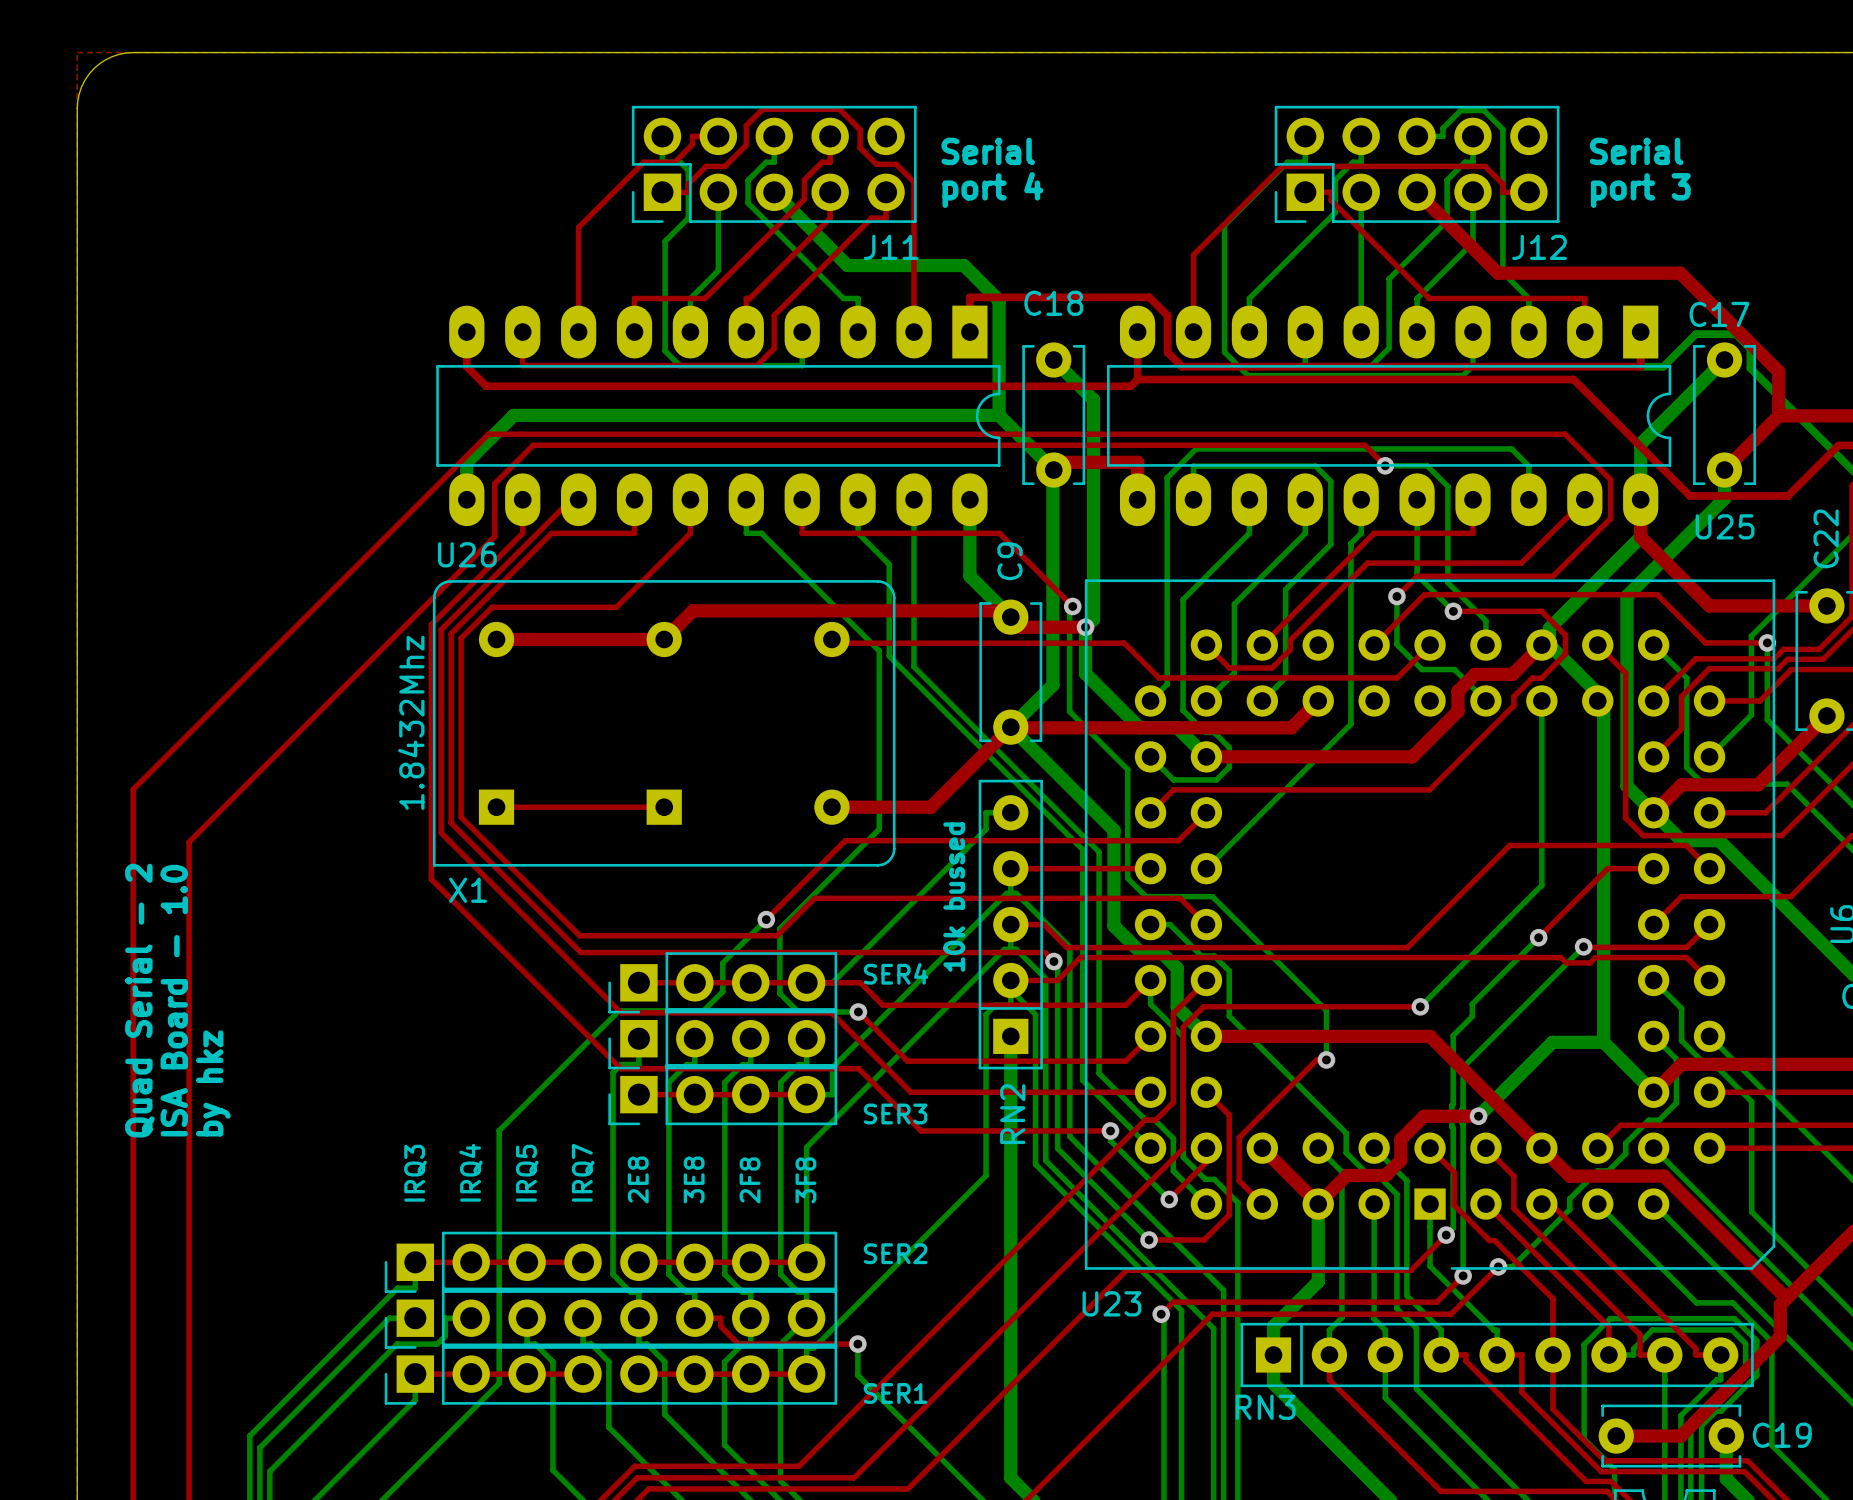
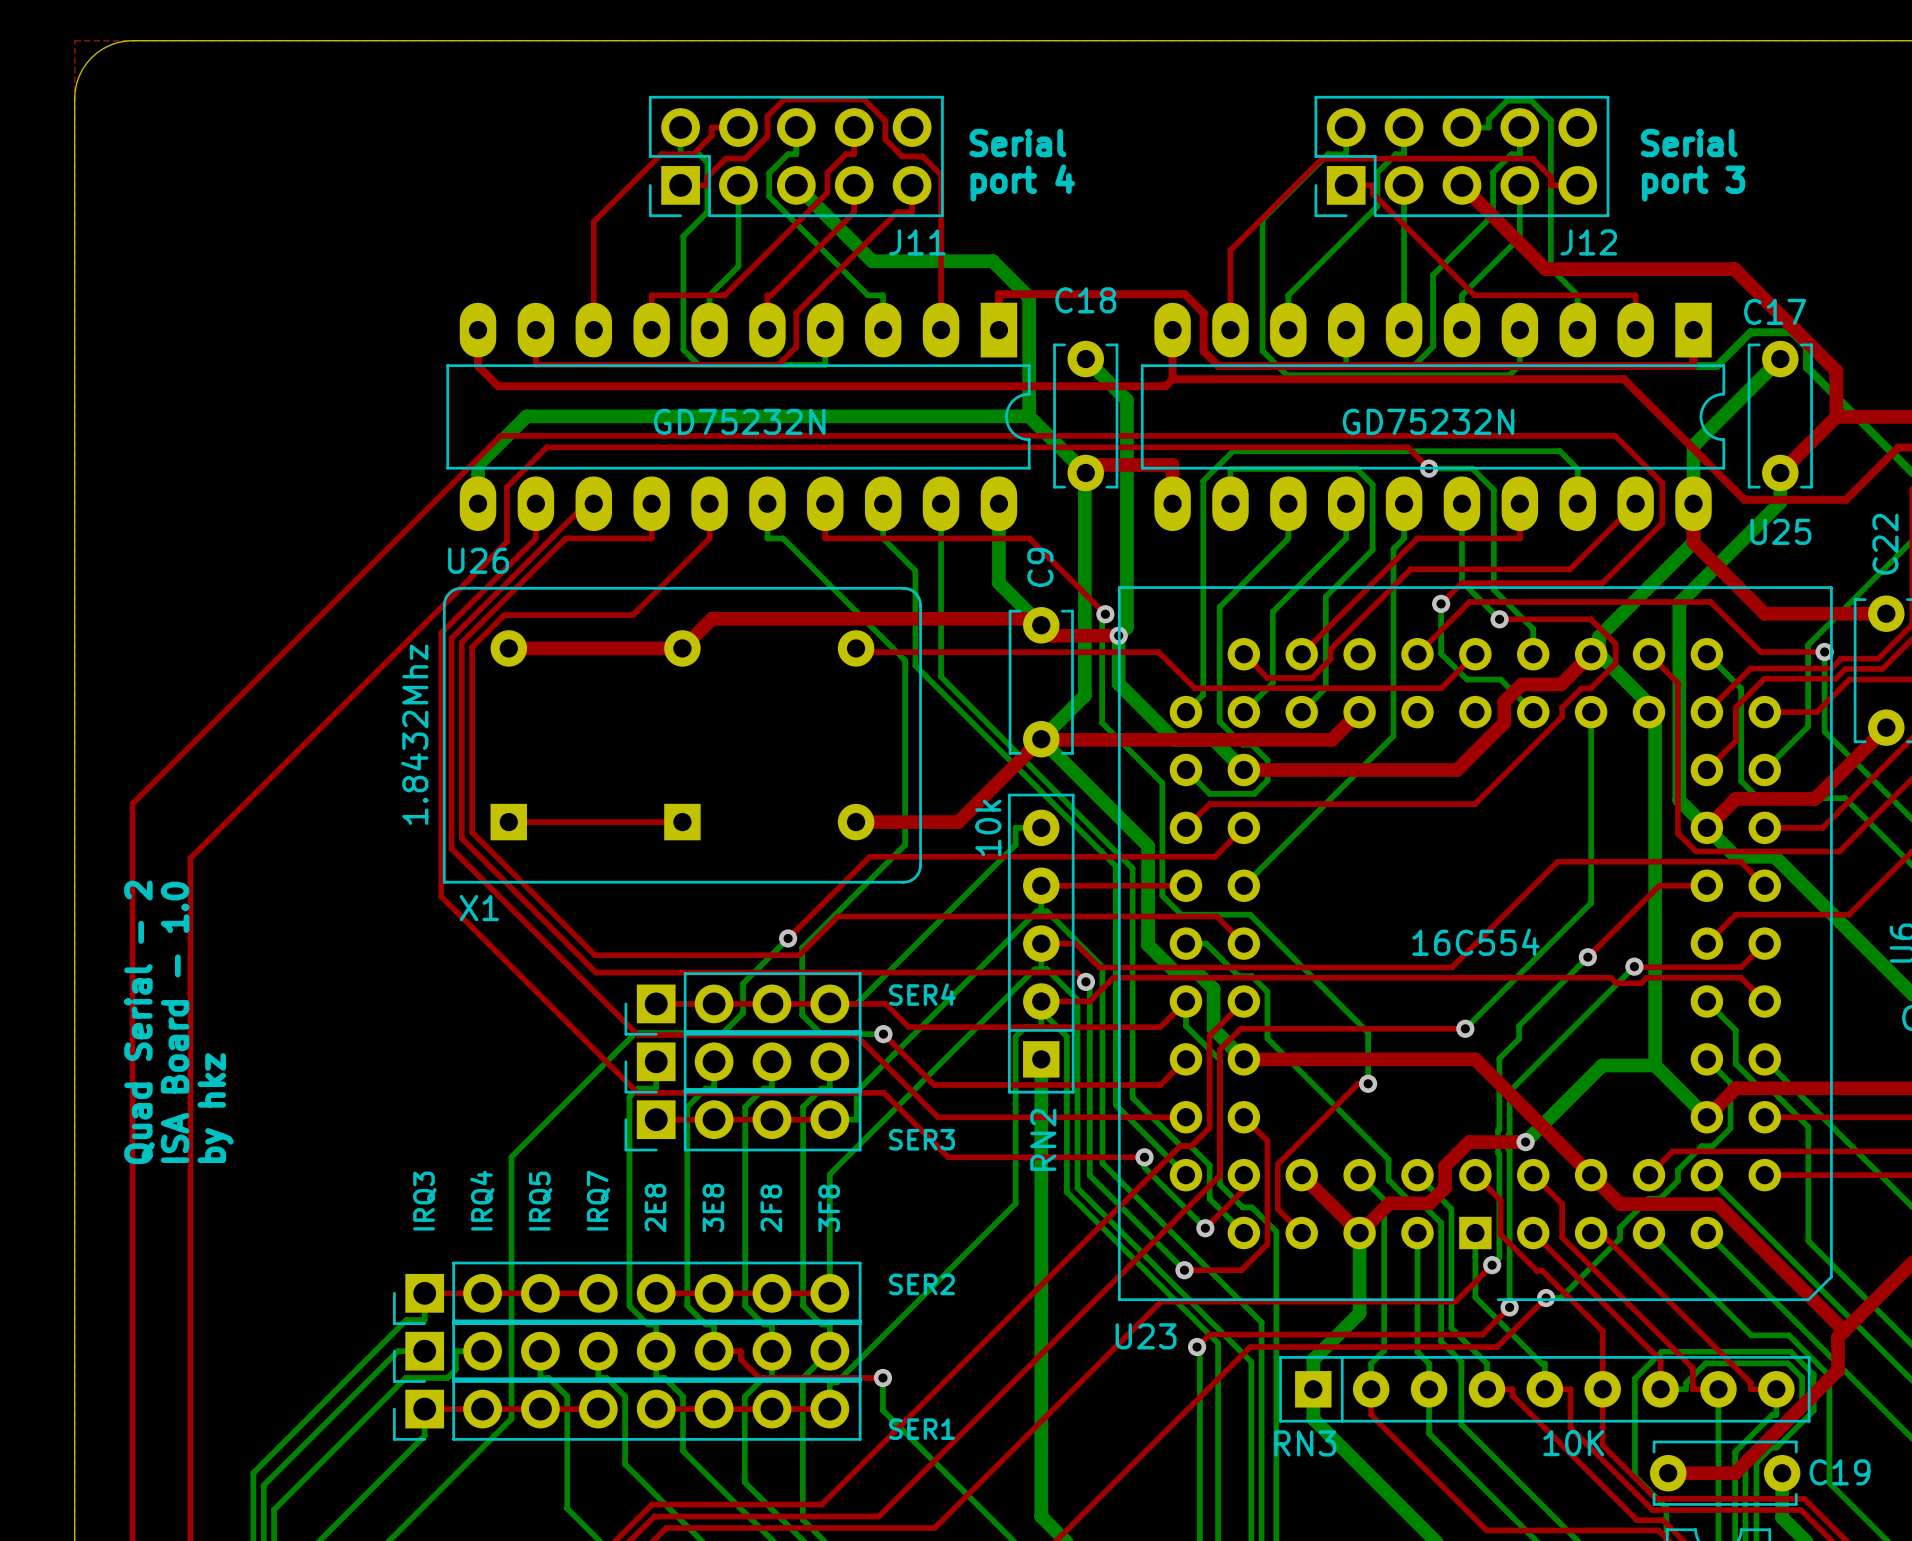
U26 value: none -> GD75232N (739, 421)
U25 value: none -> GD75232N (1428, 421)
X1 value: none -> 1.8432Mhz (414, 734)
text: 1.8432Mhz (411, 722) -> none
RN2 value: none -> 10k (988, 827)
text: 10k bussed (954, 897) -> none
U23 value: none -> 16C554 (1475, 942)
RN3 value: none -> 10K (1573, 1443)

